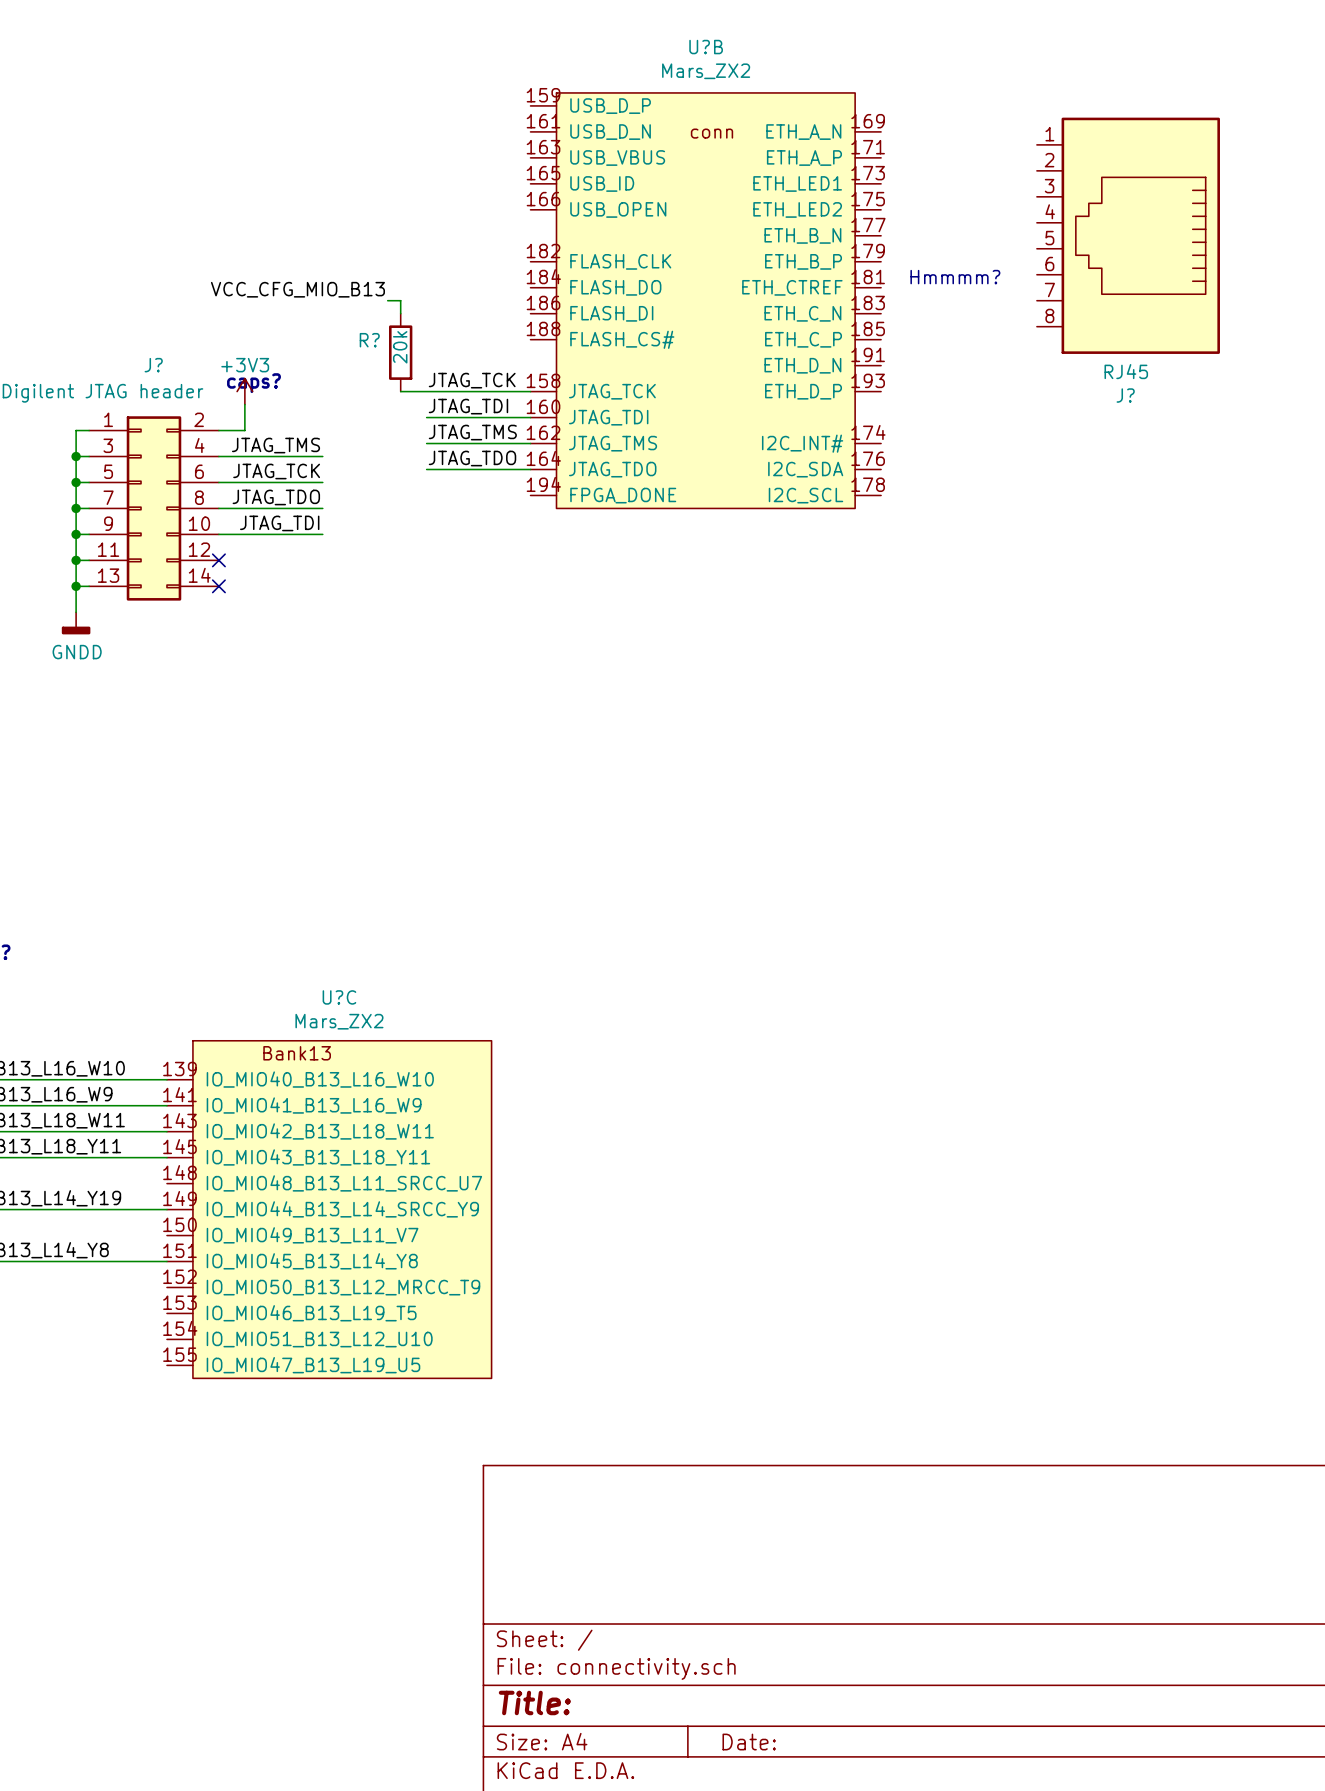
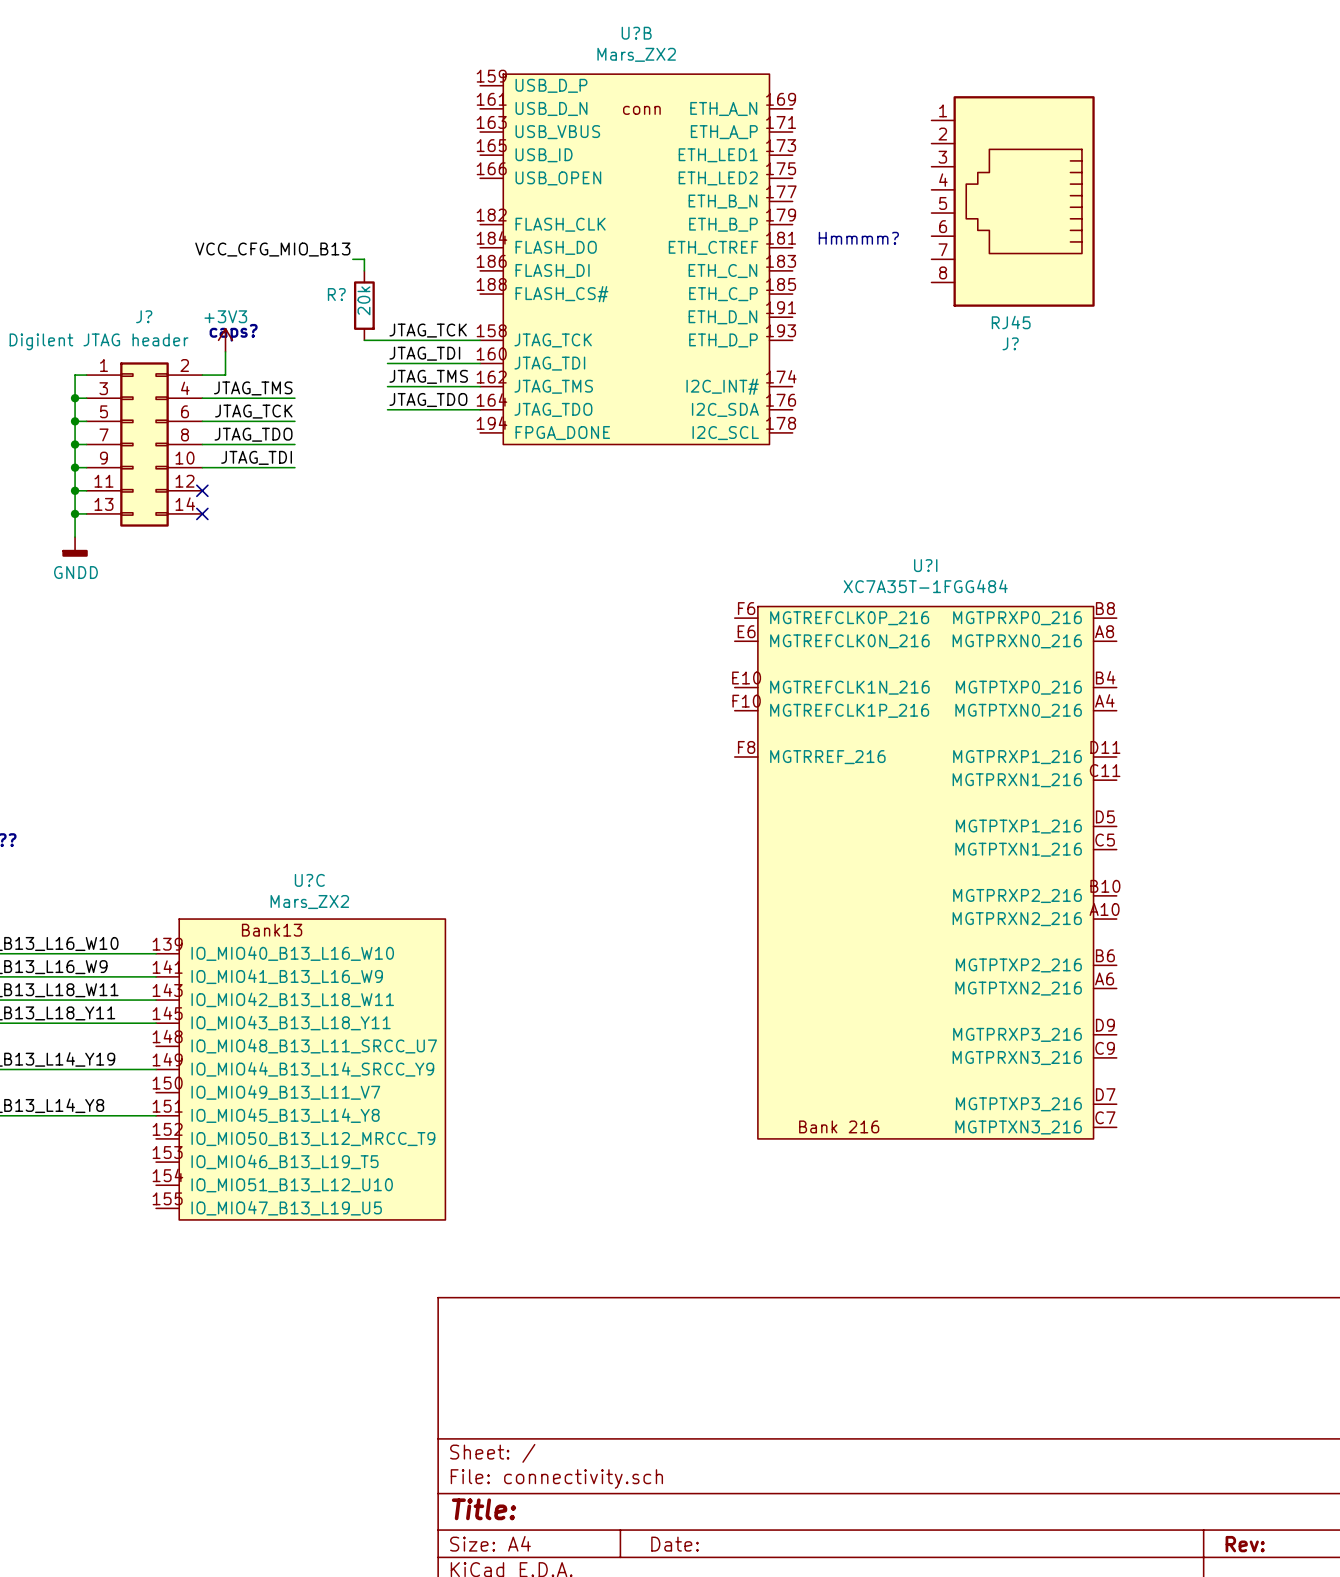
U?I: none -> XC7A35T-1FGG484 (925, 872)

